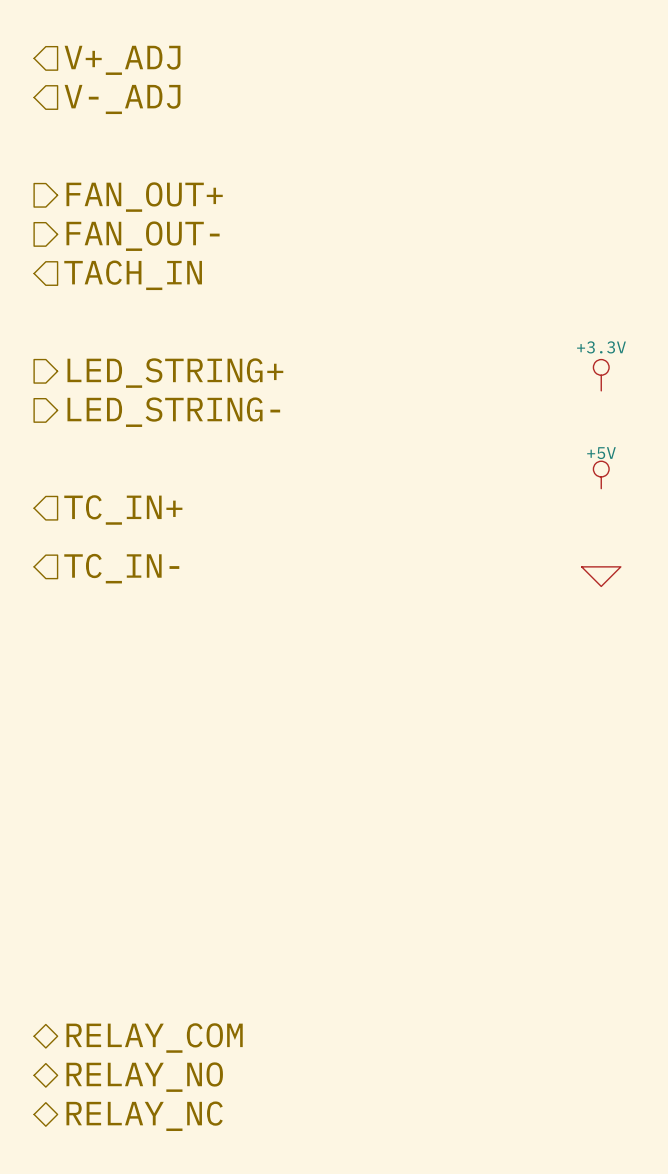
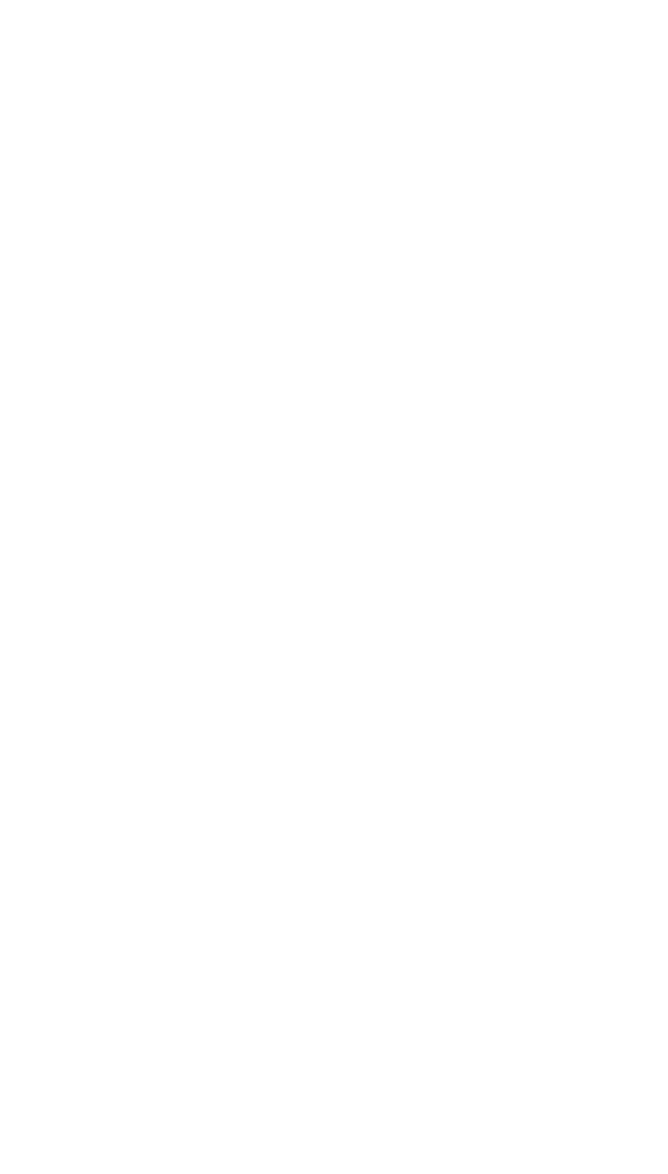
hierarchical label: V+_ADJ (122, 60) -> none
hierarchical label: V-_ADJ (122, 99) -> none
hierarchical label: FAN_OUT+ (144, 197) -> none
hierarchical label: FAN_OUT- (143, 236) -> none
hierarchical label: TACH_IN (133, 275) -> none
hierarchical label: LED_STRING+ (175, 373) -> none
power symbol: +3.3V (601, 375) -> none
hierarchical label: LED_STRING- (173, 412) -> none
power symbol: +5V (601, 474) -> none
hierarchical label: TC_IN+ (123, 509) -> none
hierarchical label: TC_IN- (121, 568) -> none
power symbol: (601, 576) -> none
hierarchical label: RELAY_COM (154, 1038) -> none
hierarchical label: RELAY_NO (144, 1077) -> none
hierarchical label: RELAY_NC (144, 1116) -> none

